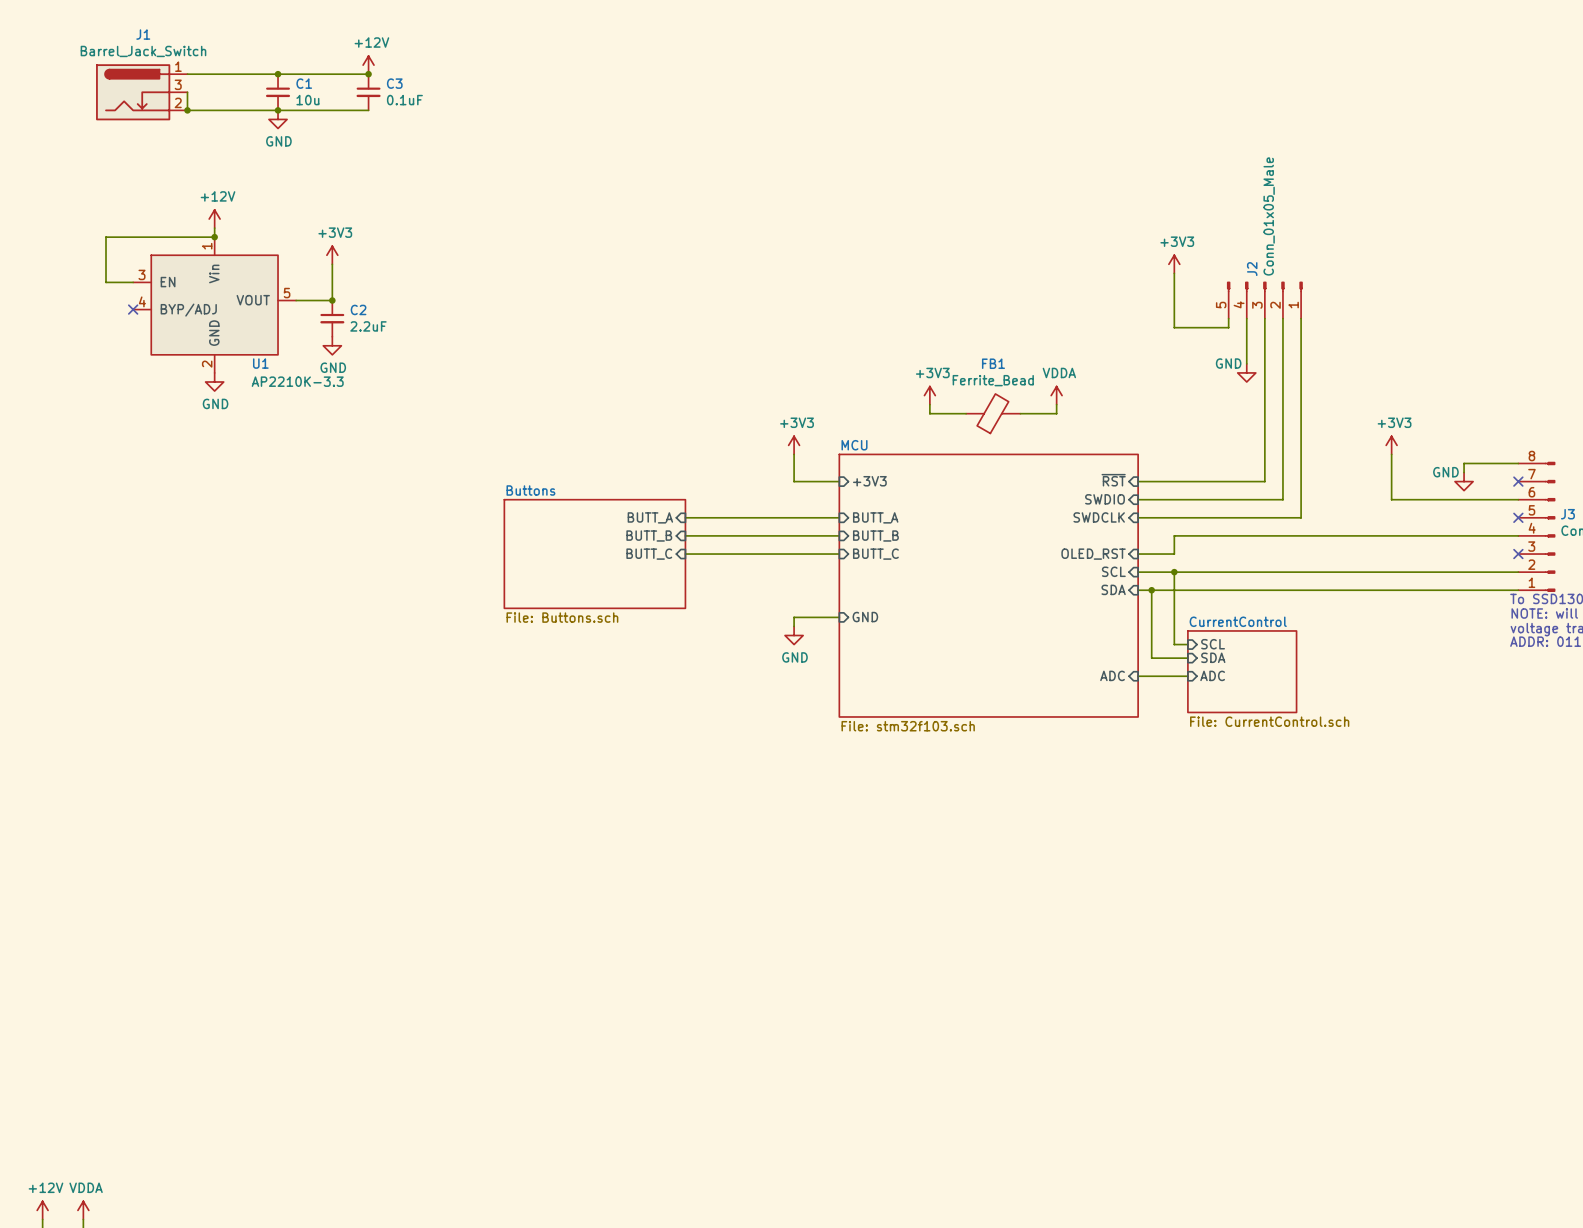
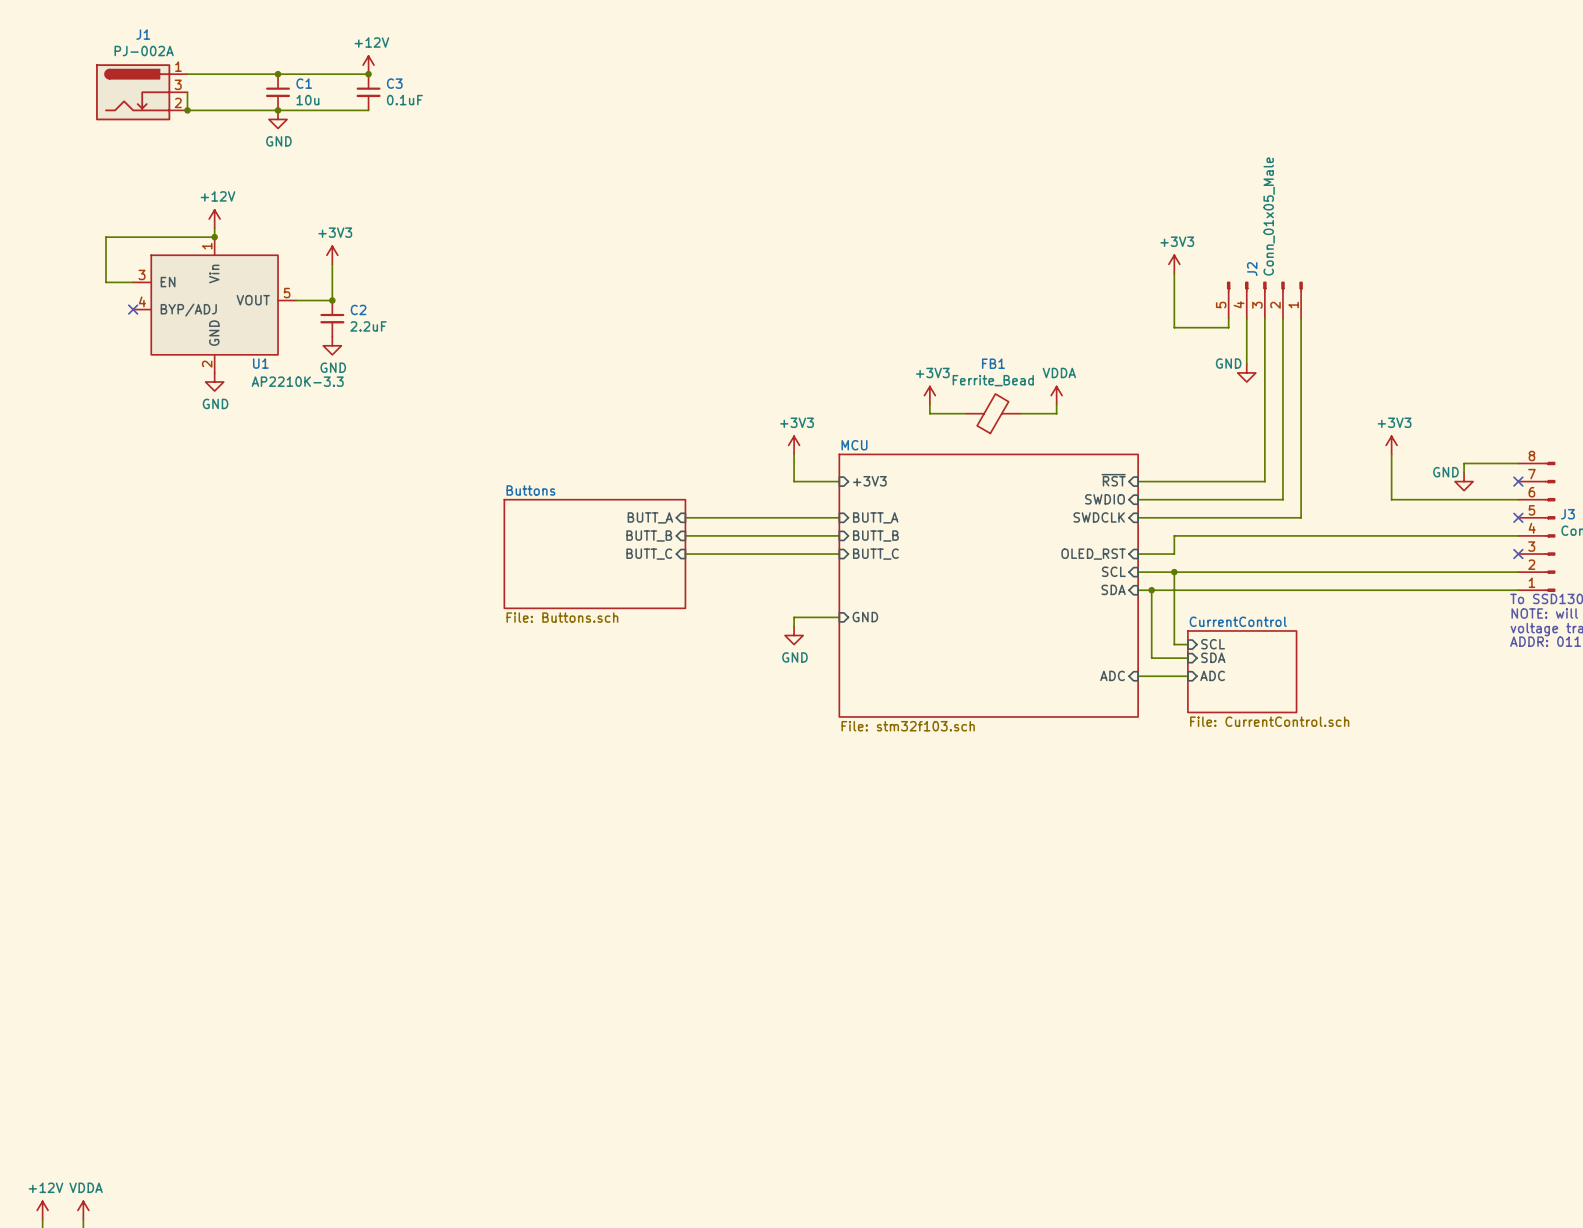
J1 value: Barrel_Jack_Switch (143, 51) -> PJ-002A (144, 51)

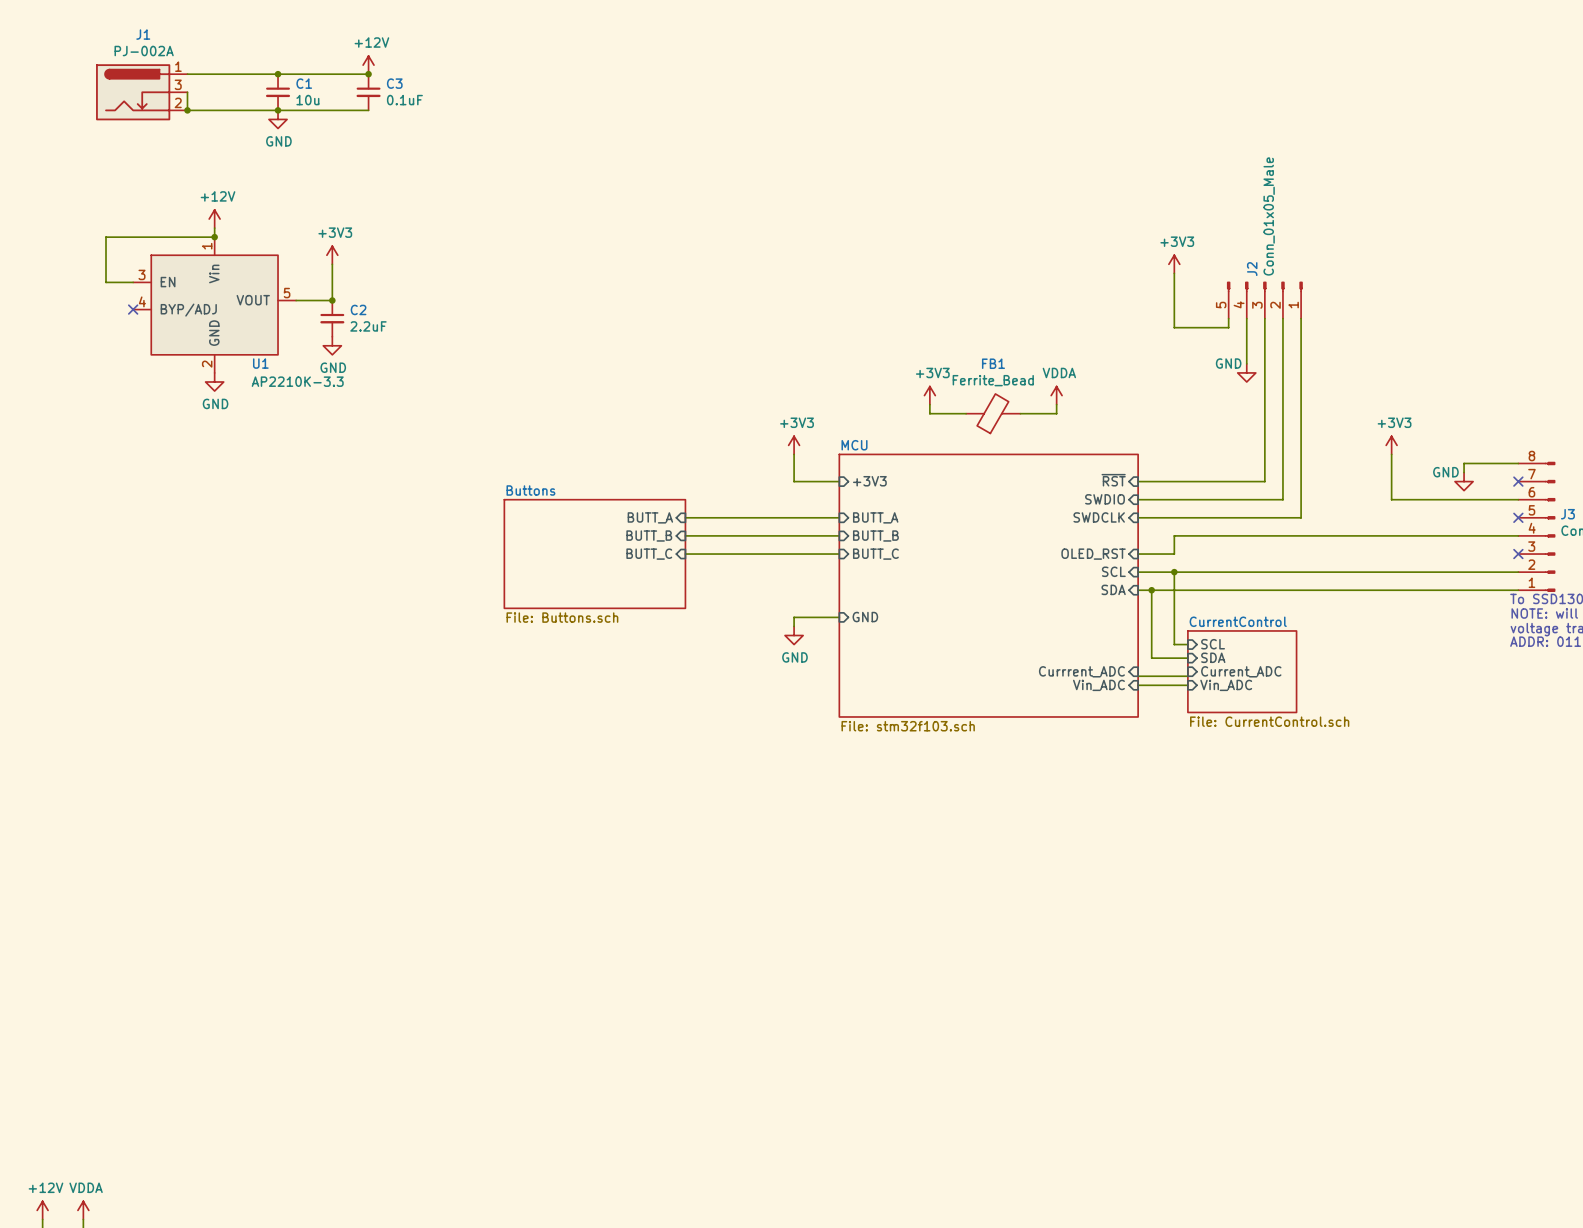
sheet pin: none -> Currrent_ADC (1081, 671)
sheet pin: none -> Current_ADC (1241, 671)
sheet pin: ADC (1112, 675) -> none
sheet pin: ADC (1212, 675) -> none
sheet pin: none -> Vin_ADC (1098, 685)
wire: none -> (1138, 685) (1187, 685)
sheet pin: none -> Vin_ADC (1226, 685)

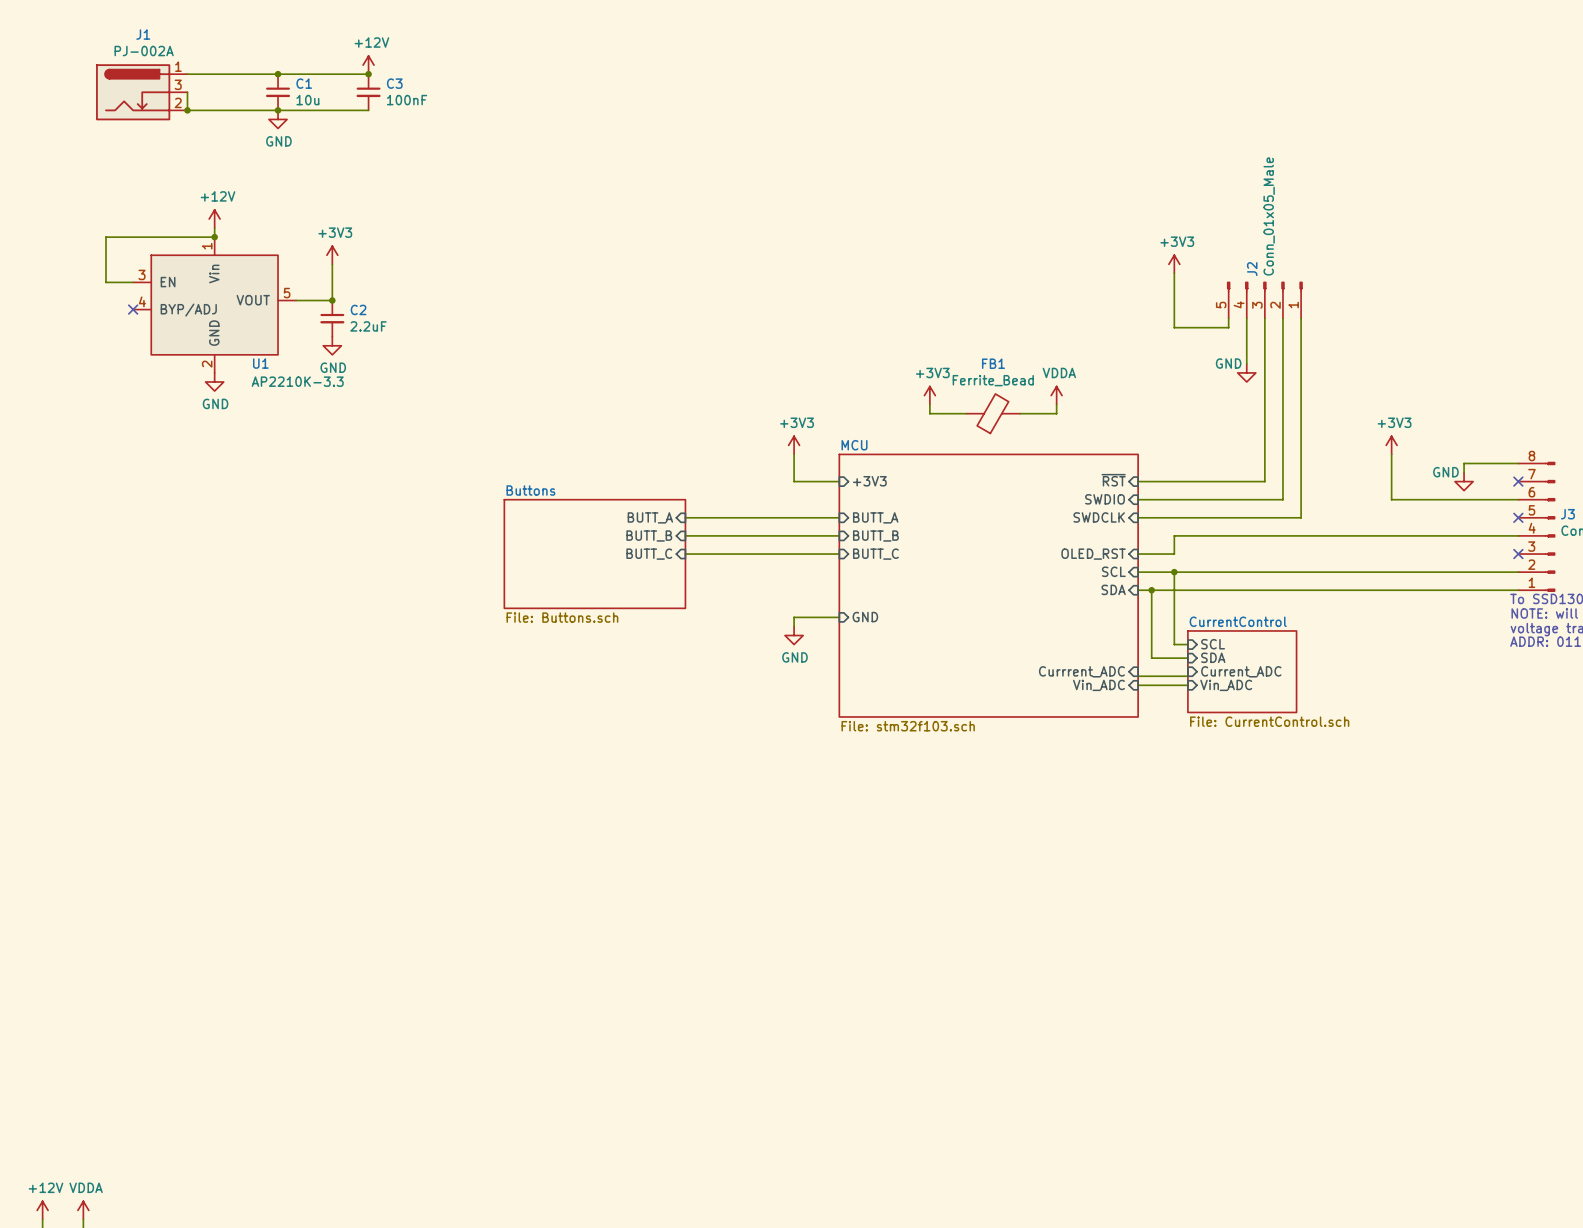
C3 value: 0.1uF (404, 100) -> 100nF (407, 100)

